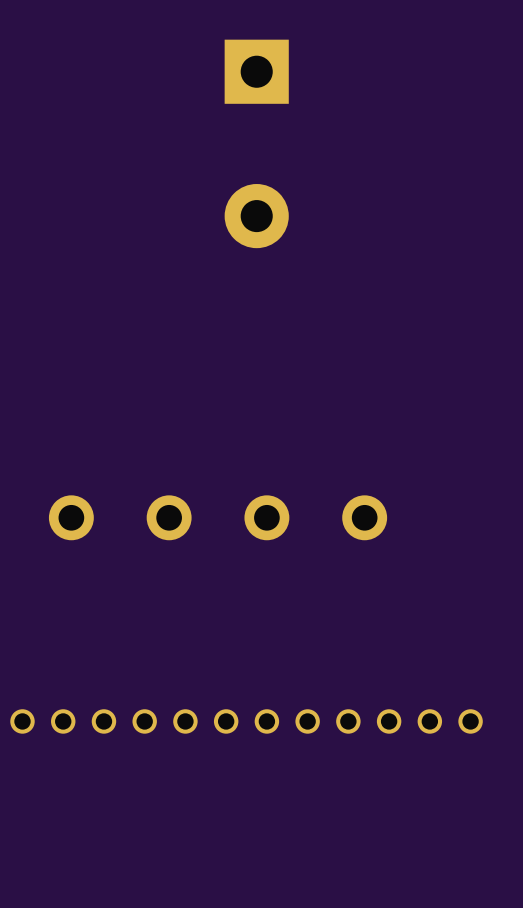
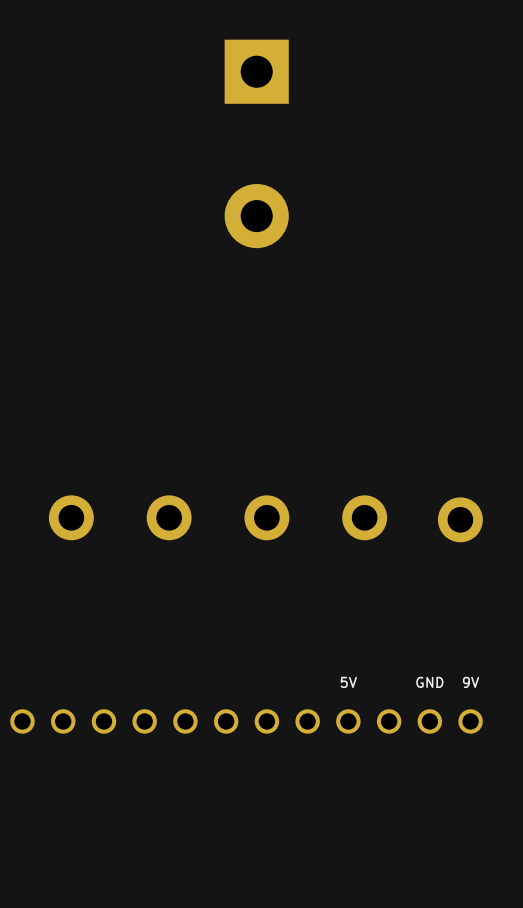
part: none -> (460, 519)
text: none -> 5V (348, 682)
text: none -> GND (429, 682)
text: none -> 9V (471, 682)

